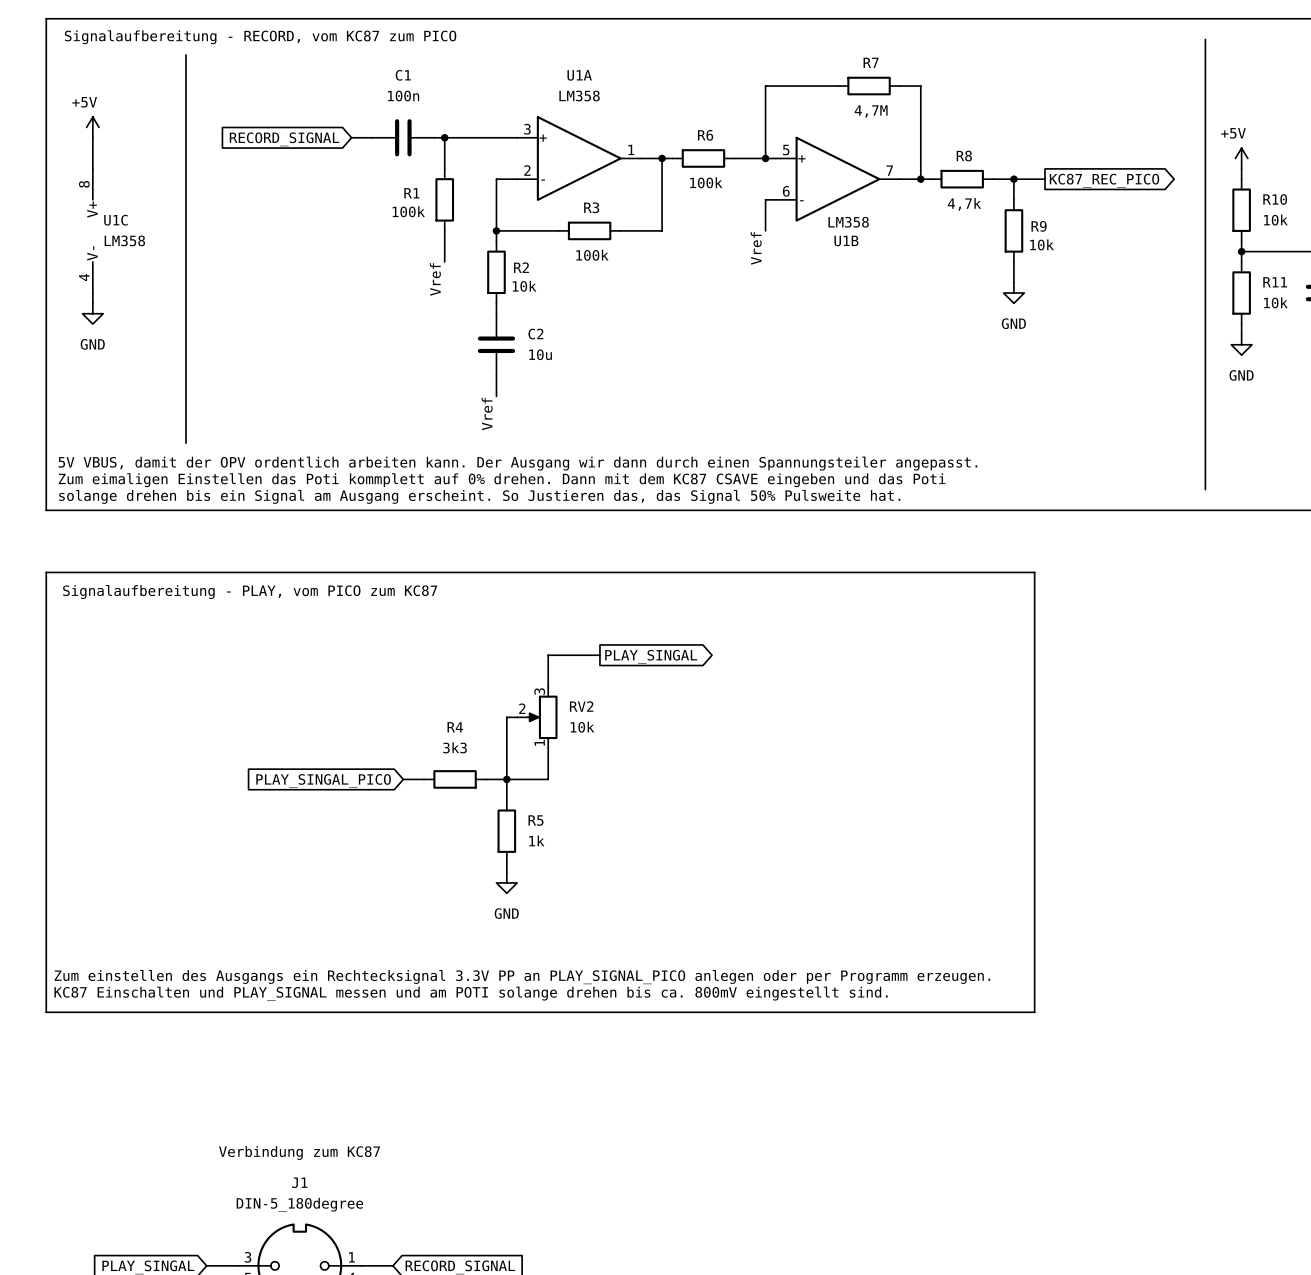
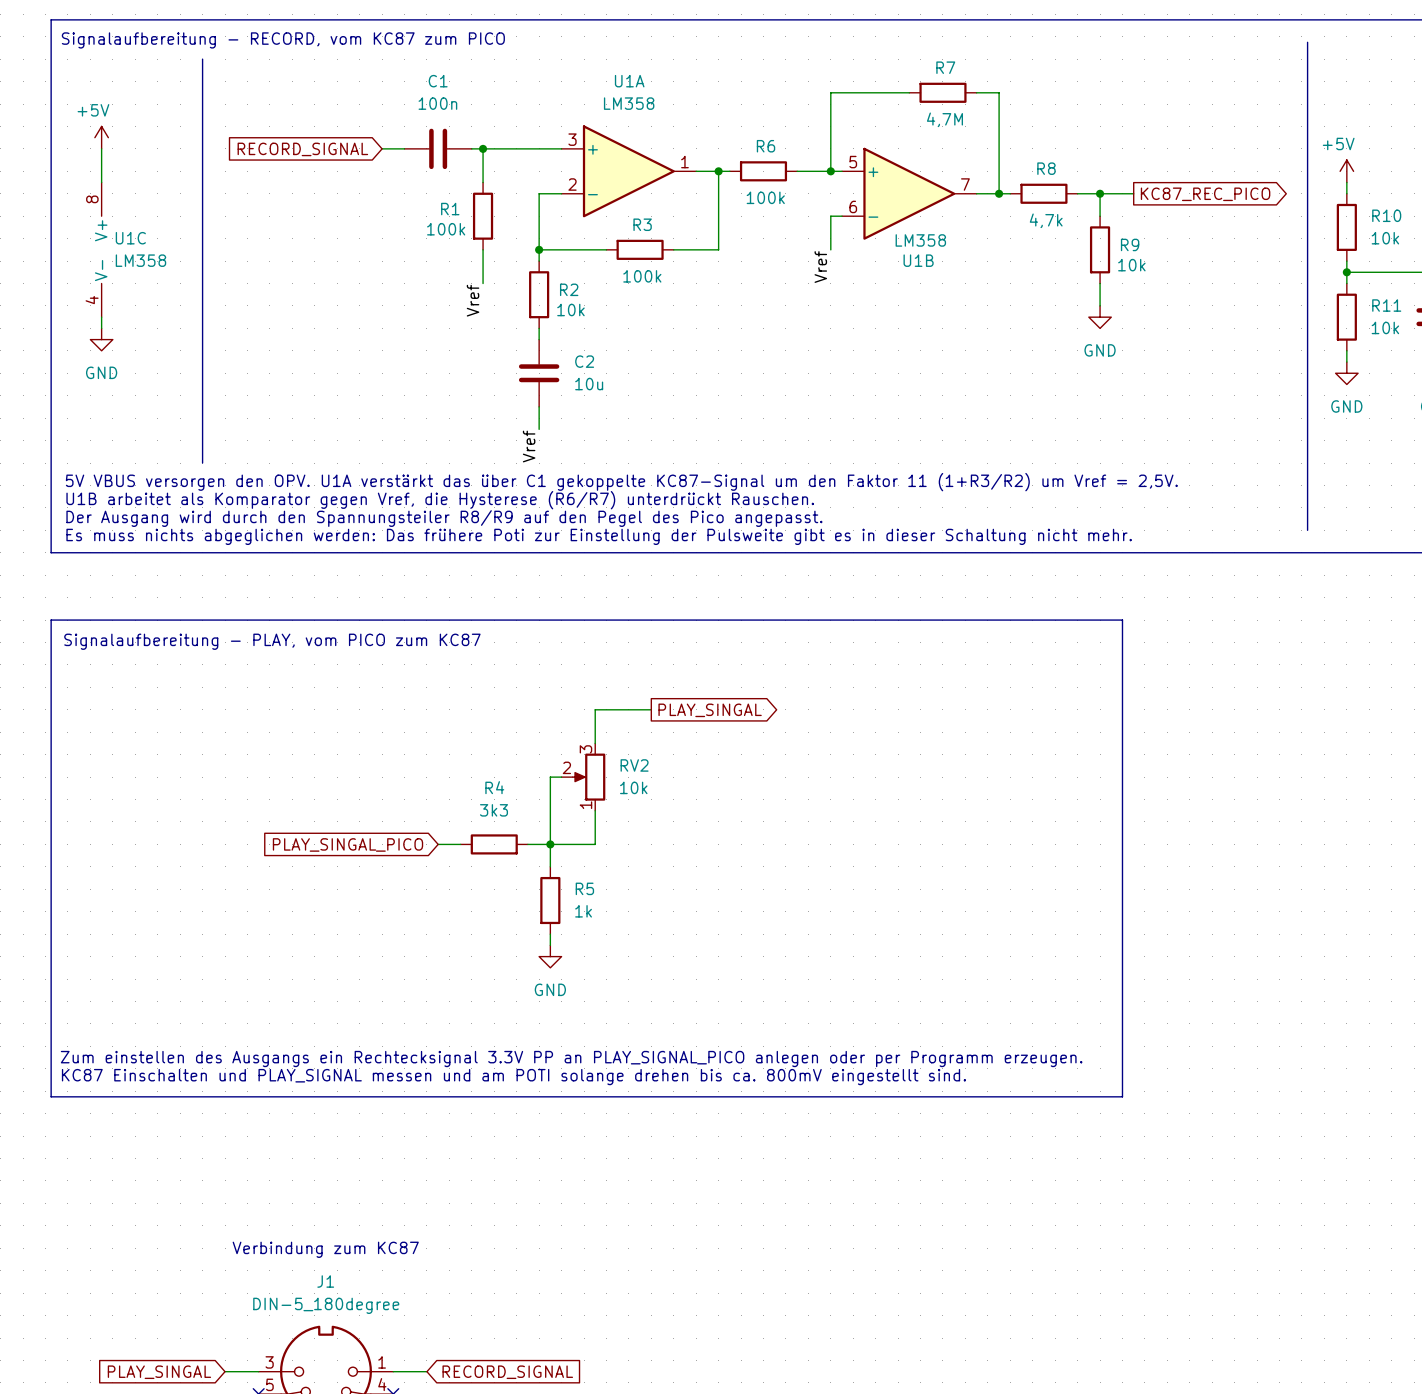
line: (185, 427) (185, 443) -> none
text: none -> 5V VBUS versorgen den OPV. U1A verstärkt das über C1 gekoppelte KC87-Signal um den Faktor 11 (1+R3/R2) um Vref = 2,5V. (621, 482)
text: 5V VBUS, damit der OPV ordentlich arbeiten kann. Der Ausgang wir dann durch einen Spannungsteiler angepasst. (517, 463) -> U1B arbeitet als Komparator gegen Vref, die Hysterese (R6/R7) unterdrückt Rauschen. (440, 500)
text: Zum eimaligen Einstellen das Poti kommplett auf 0% drehen. Dann mit dem KC87 CSAVE eingeben und das Poti (502, 480) -> Der Ausgang wird durch den Spannungsteiler R8/R9 auf den Pegel des Pico angepasst. (444, 518)
text: solange drehen bis ein Signal am Ausgang erscheint. So Justieren das, das Signal 50% Pulsweite hat. (479, 496) -> Es muss nichts abgeglichen werden: Das frühere Poti zur Einstellung der Pulsweite gibt es in dieser Schaltung nicht mehr. (599, 536)

